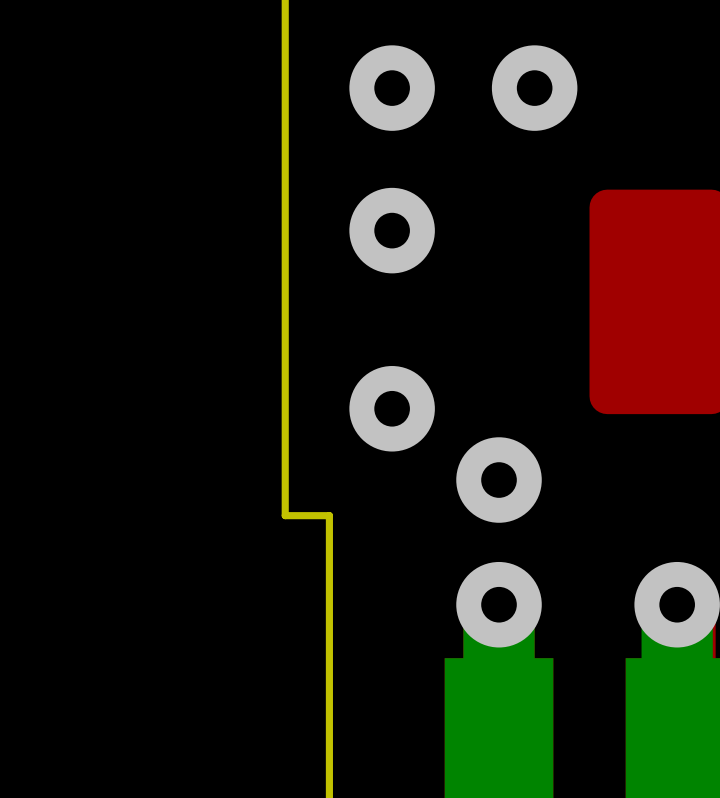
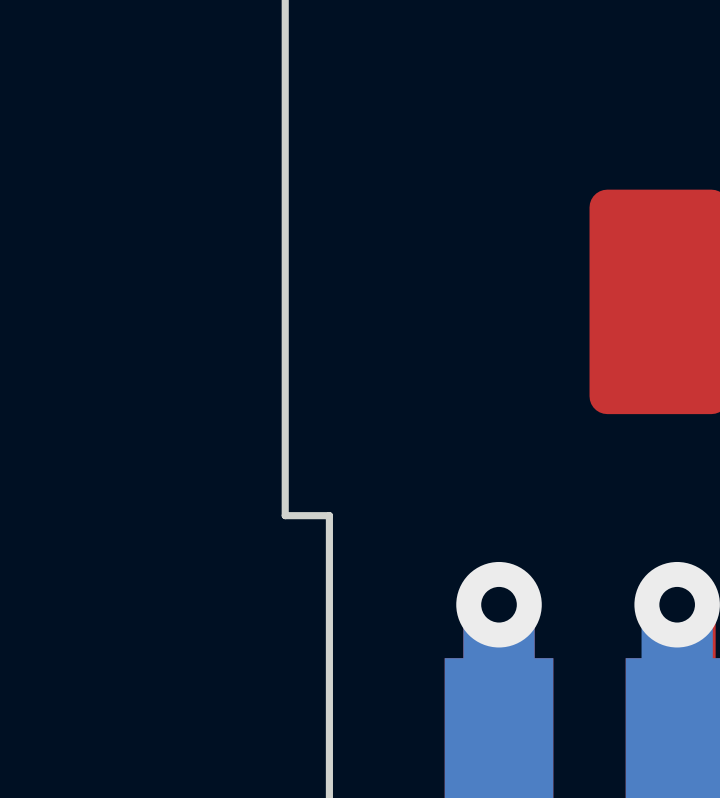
via: (392, 88) -> none
via: (534, 88) -> none
via: (392, 230) -> none
via: (392, 408) -> none
via: (499, 480) -> none

